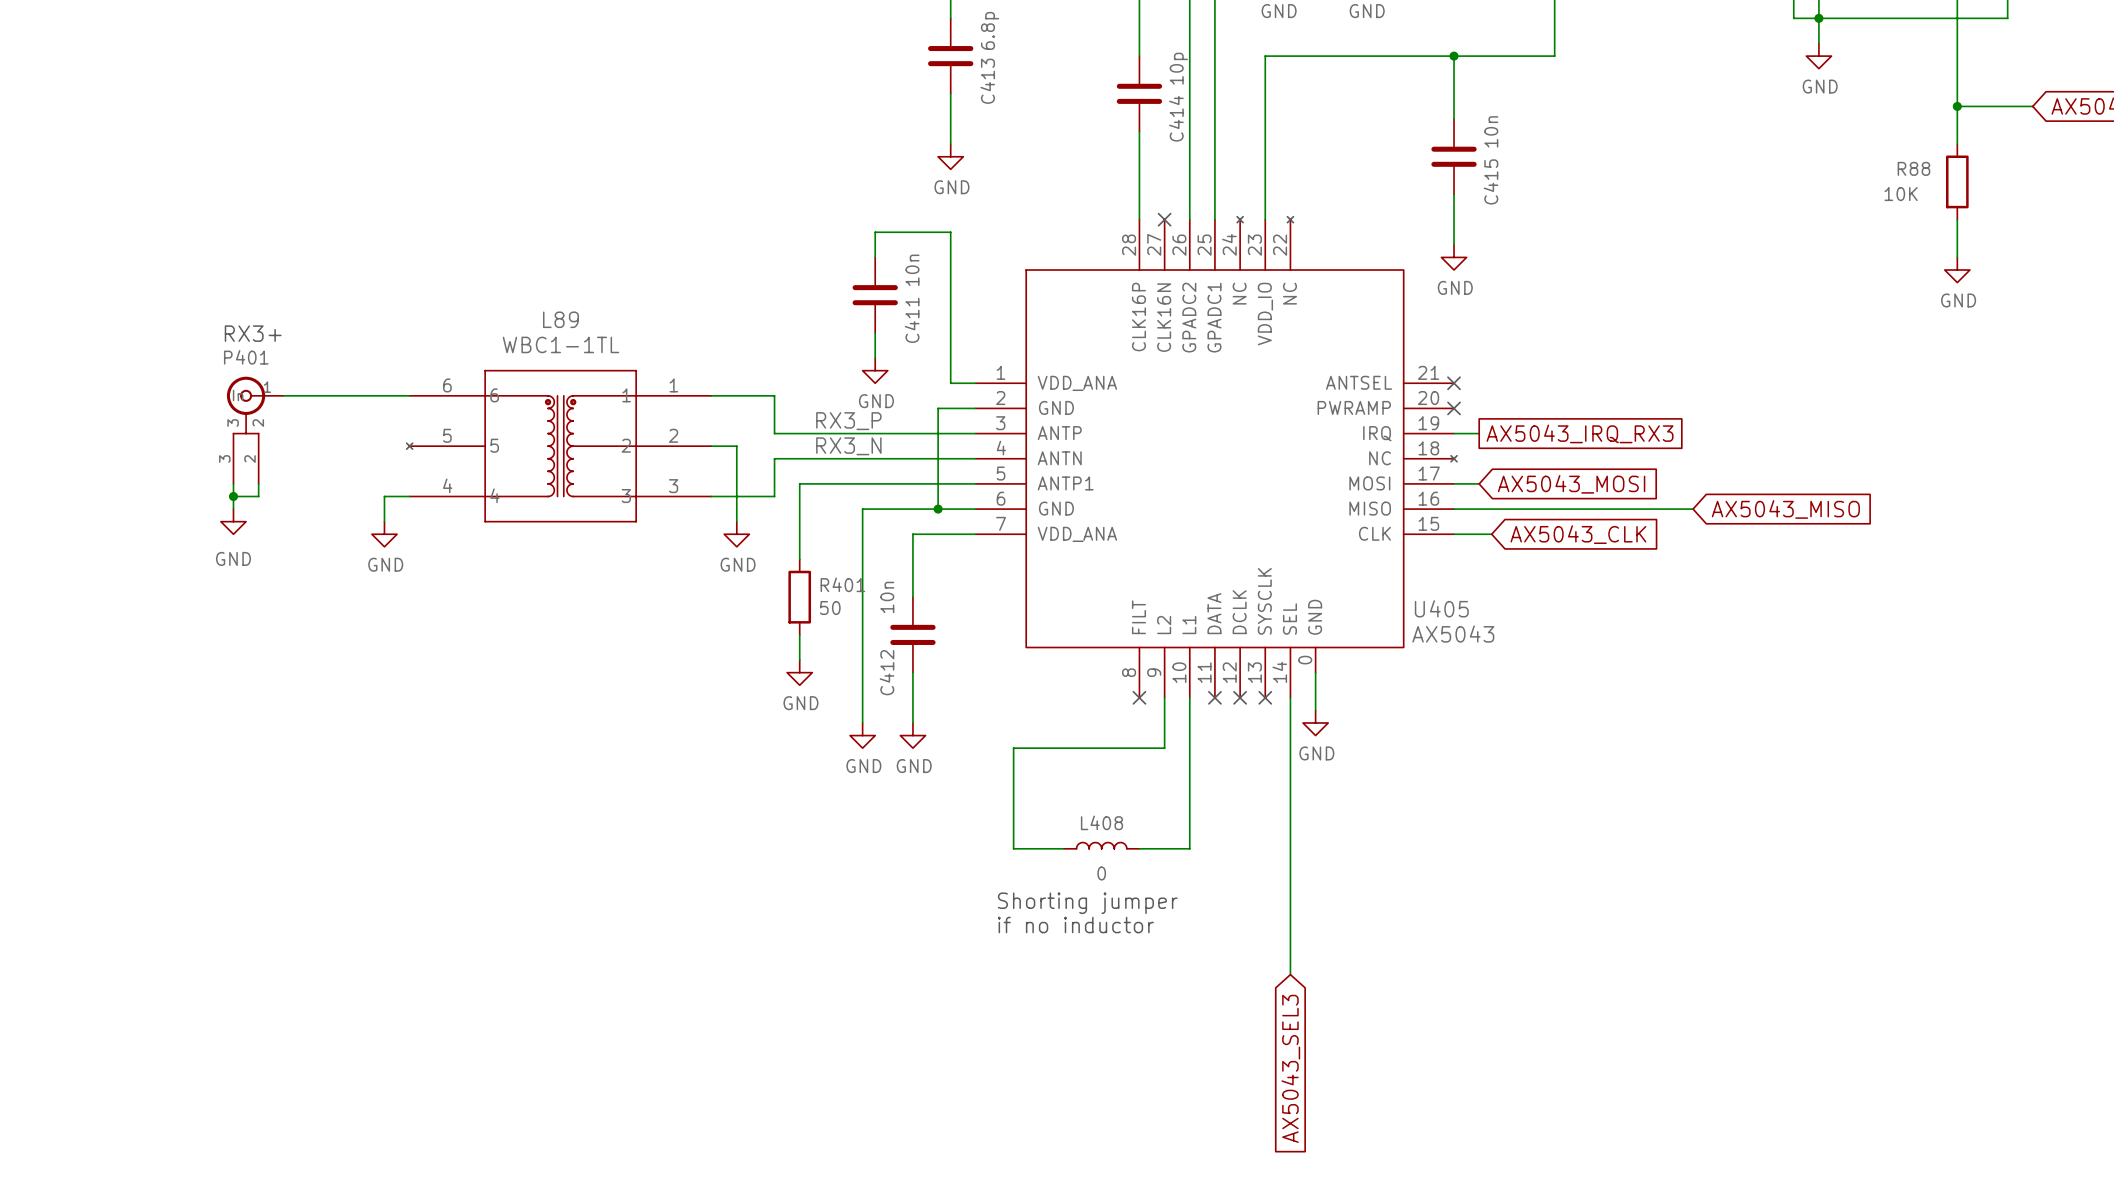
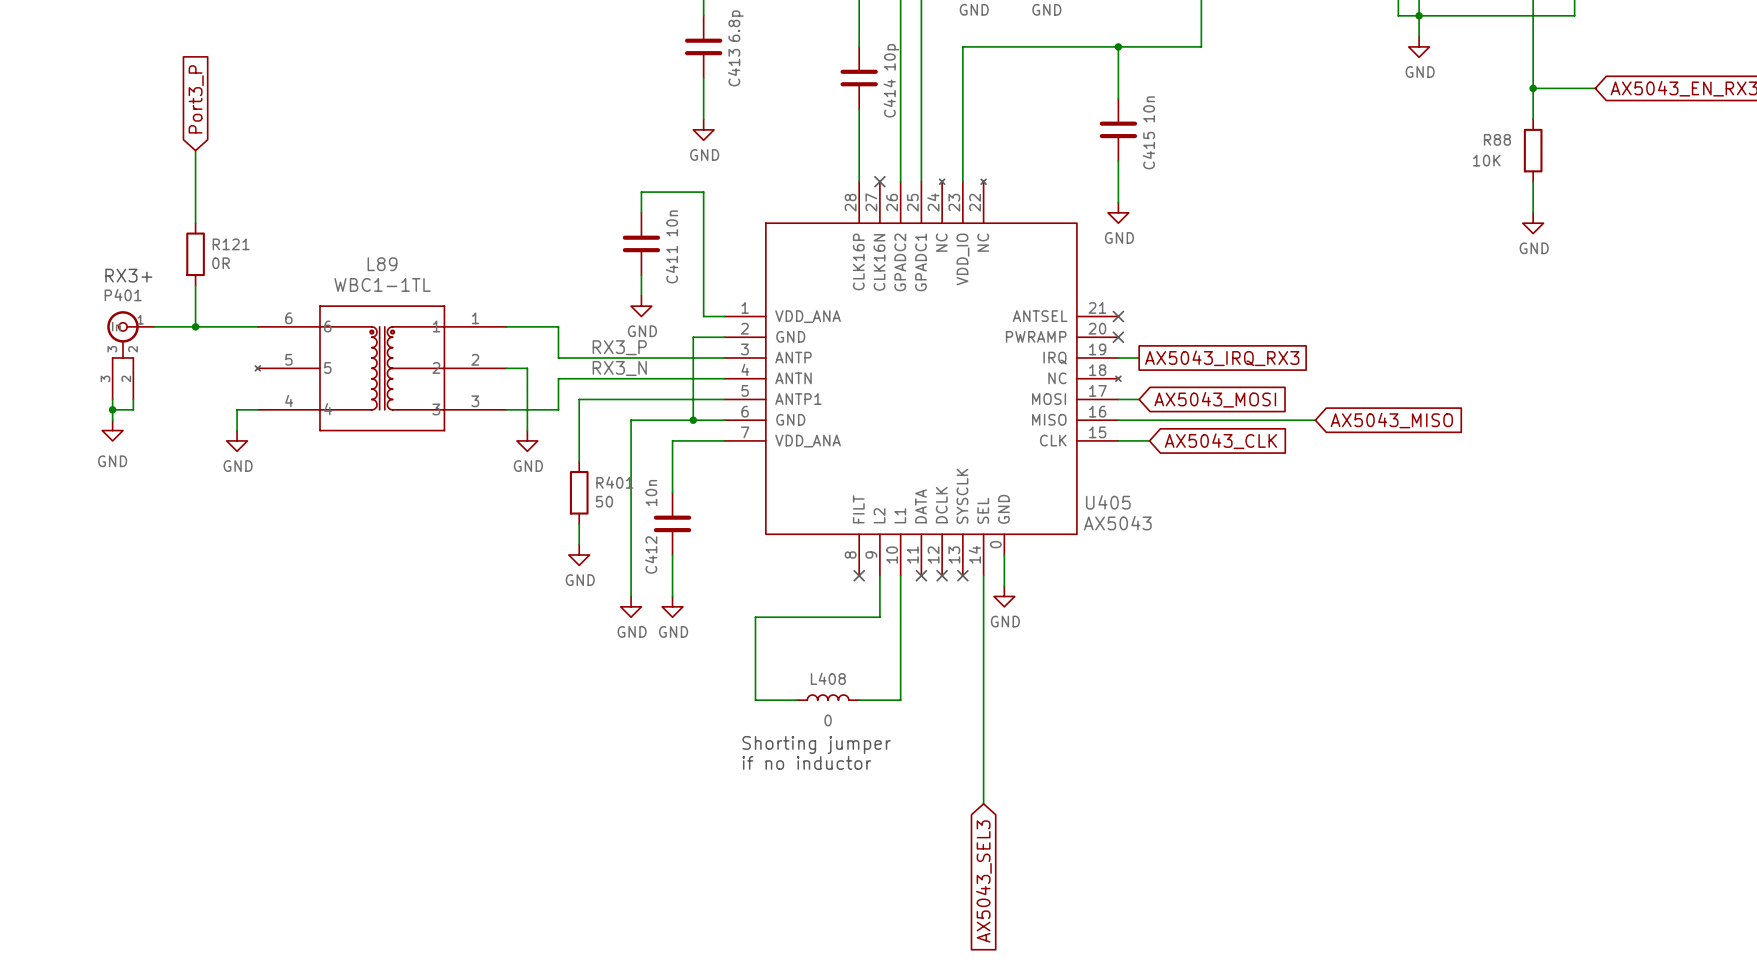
global label: none -> Port3_P (196, 99)
wire: none -> (195, 150) (195, 223)
R121: none -> 0R (195, 254)
wire: none -> (195, 285) (195, 326)
junction: none -> (195, 326)

